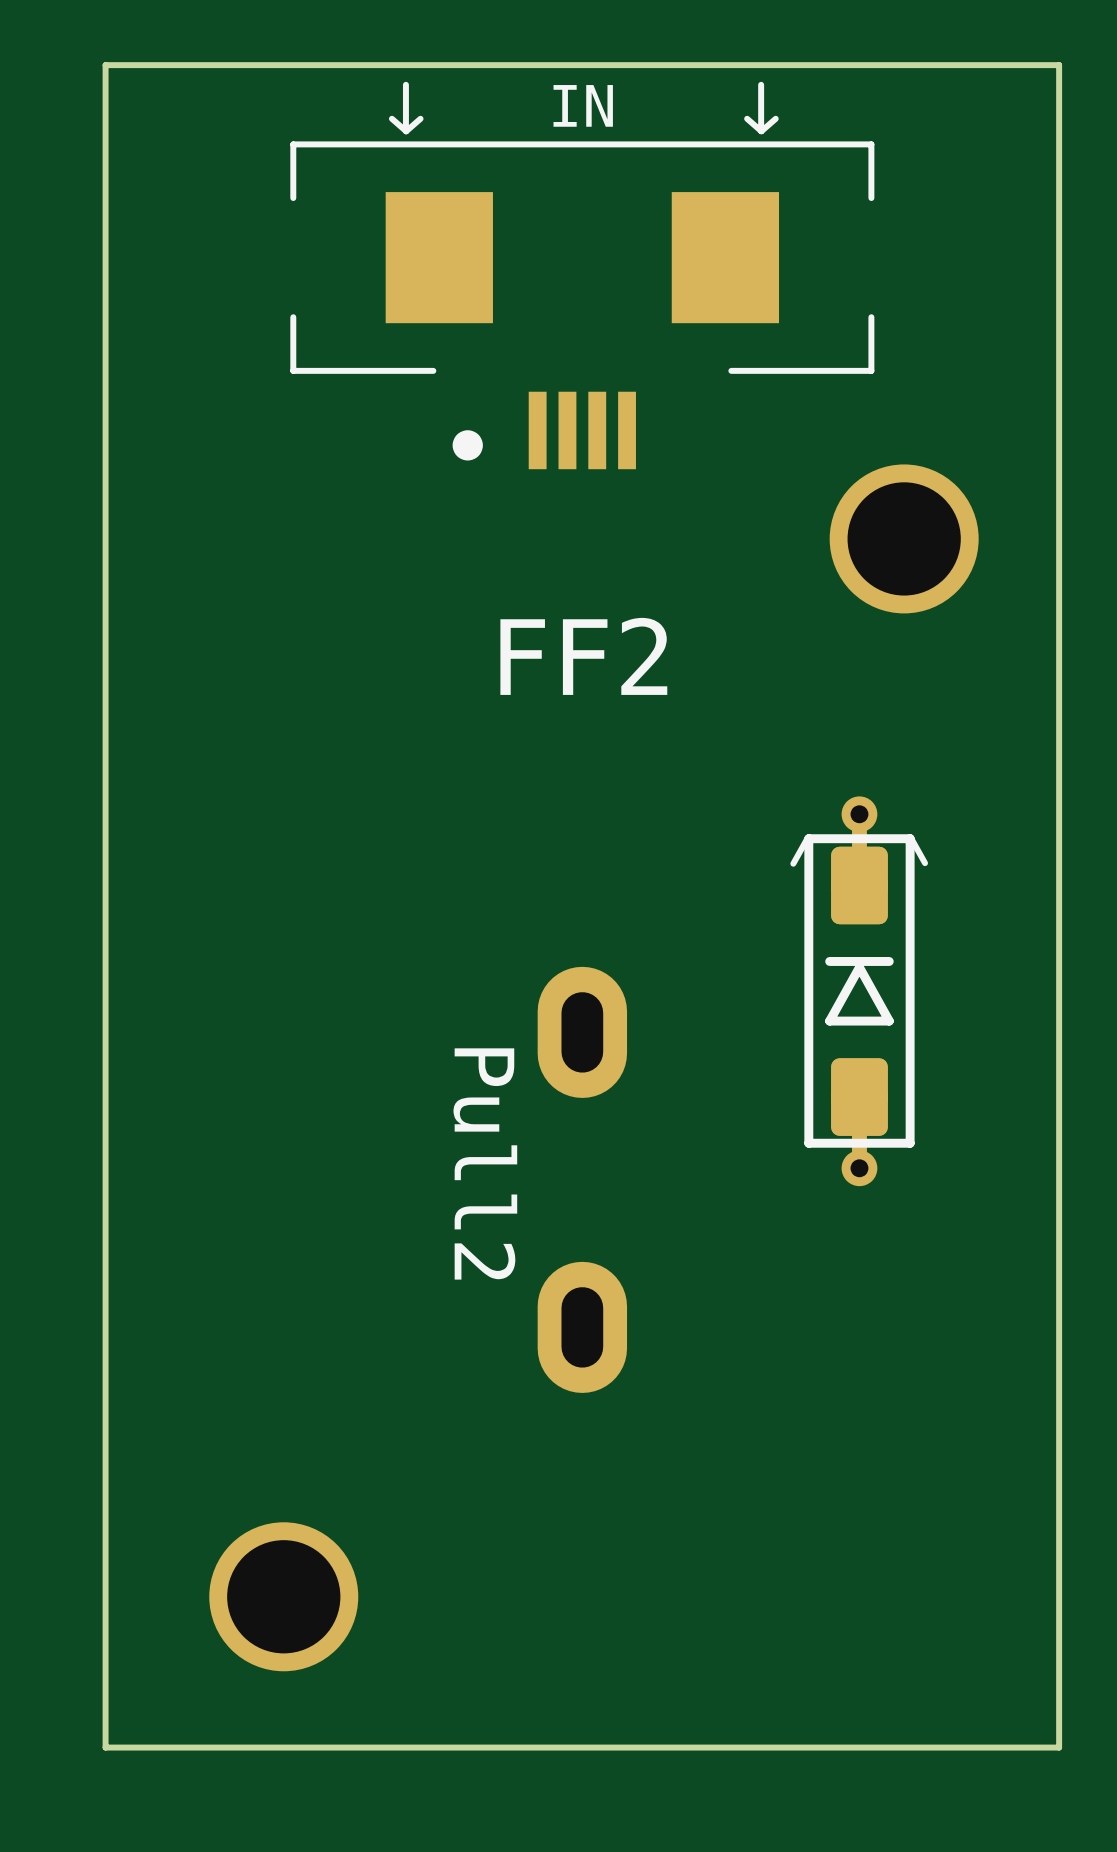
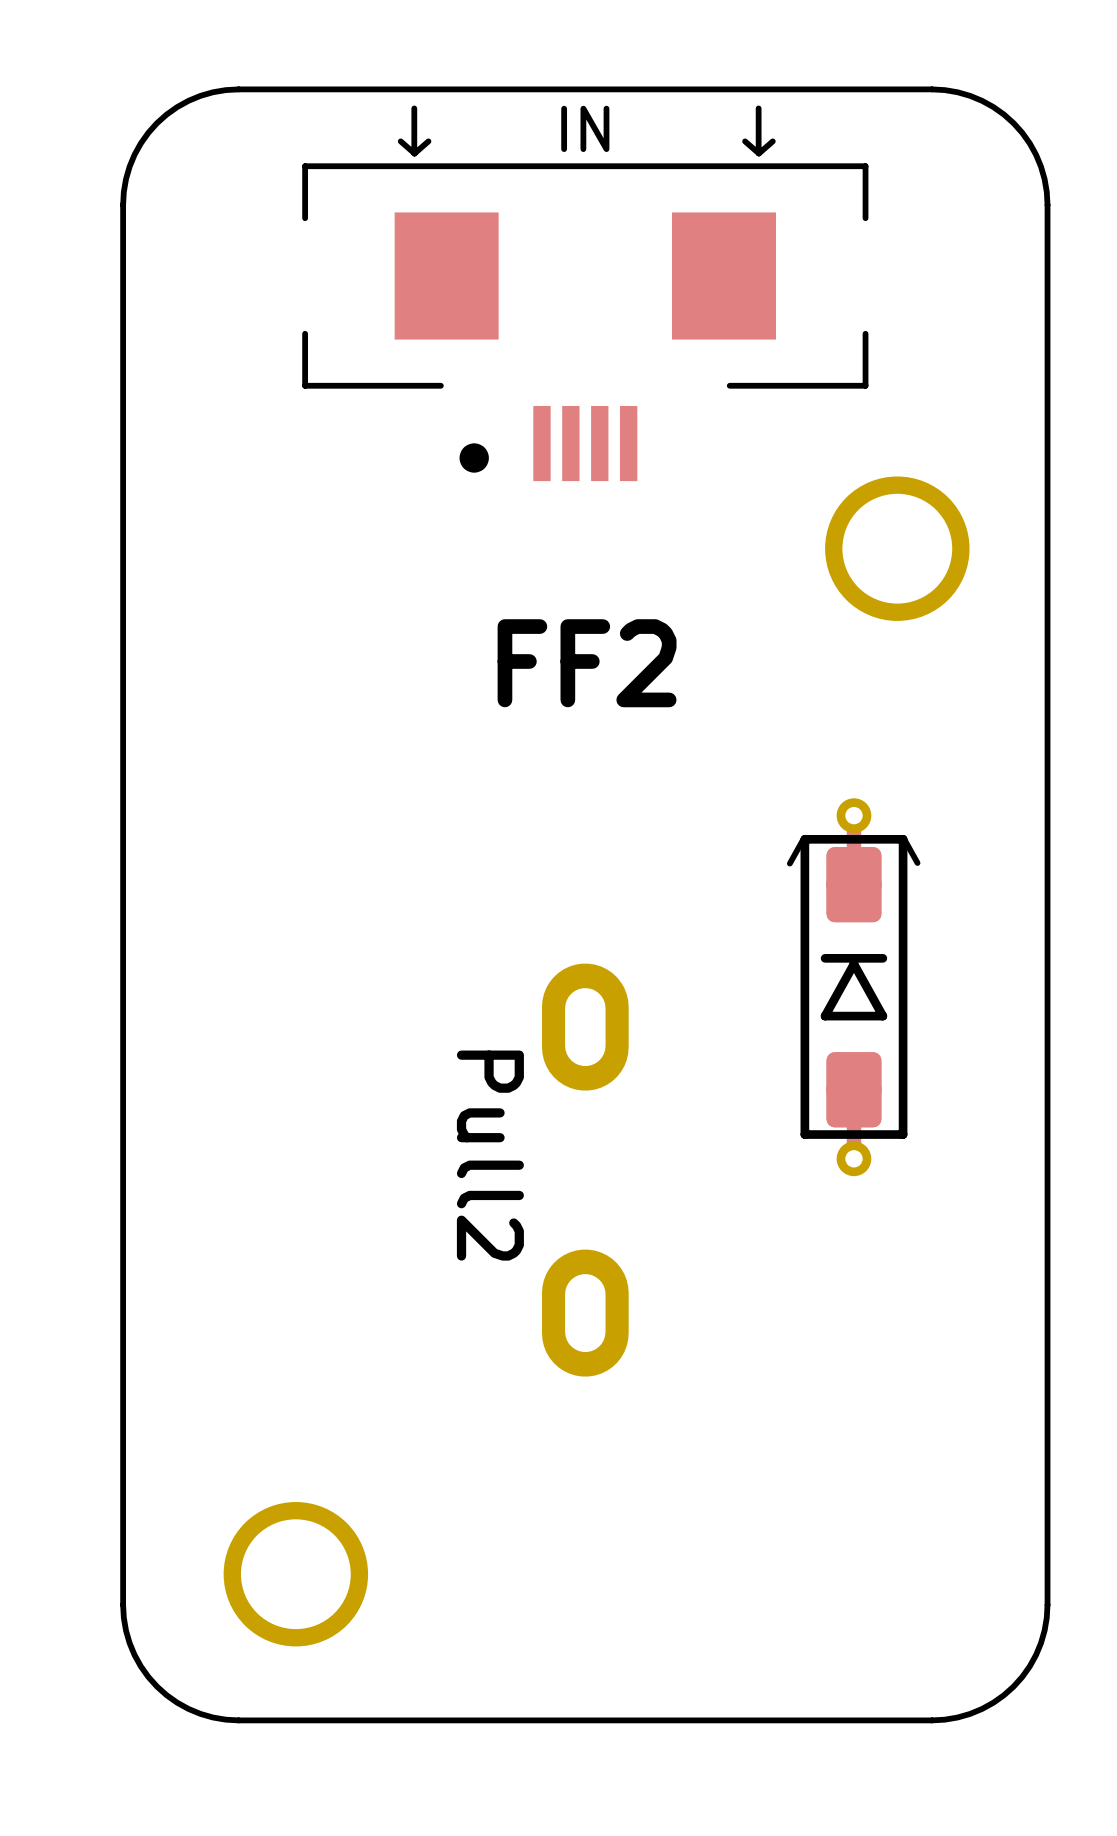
board edge: (224, 65) (105, 65) (105, 184) -> (238, 89) (200, 95) (177, 107) (156, 123) (134, 154) (126, 179) (123, 204)
board edge: (939, 65) (1059, 65) (1059, 184) -> (931, 89) (970, 95) (993, 107) (1013, 123) (1036, 154) (1044, 179) (1047, 204)
board edge: (105, 1628) (105, 1747) (224, 1747) -> (123, 1604) (129, 1643) (140, 1666) (156, 1686) (177, 1702) (200, 1713) (238, 1720)
board edge: (1059, 1628) (1059, 1747) (939, 1747) -> (1047, 1604) (1044, 1630) (1036, 1654) (1013, 1686) (993, 1702) (970, 1713) (931, 1720)

